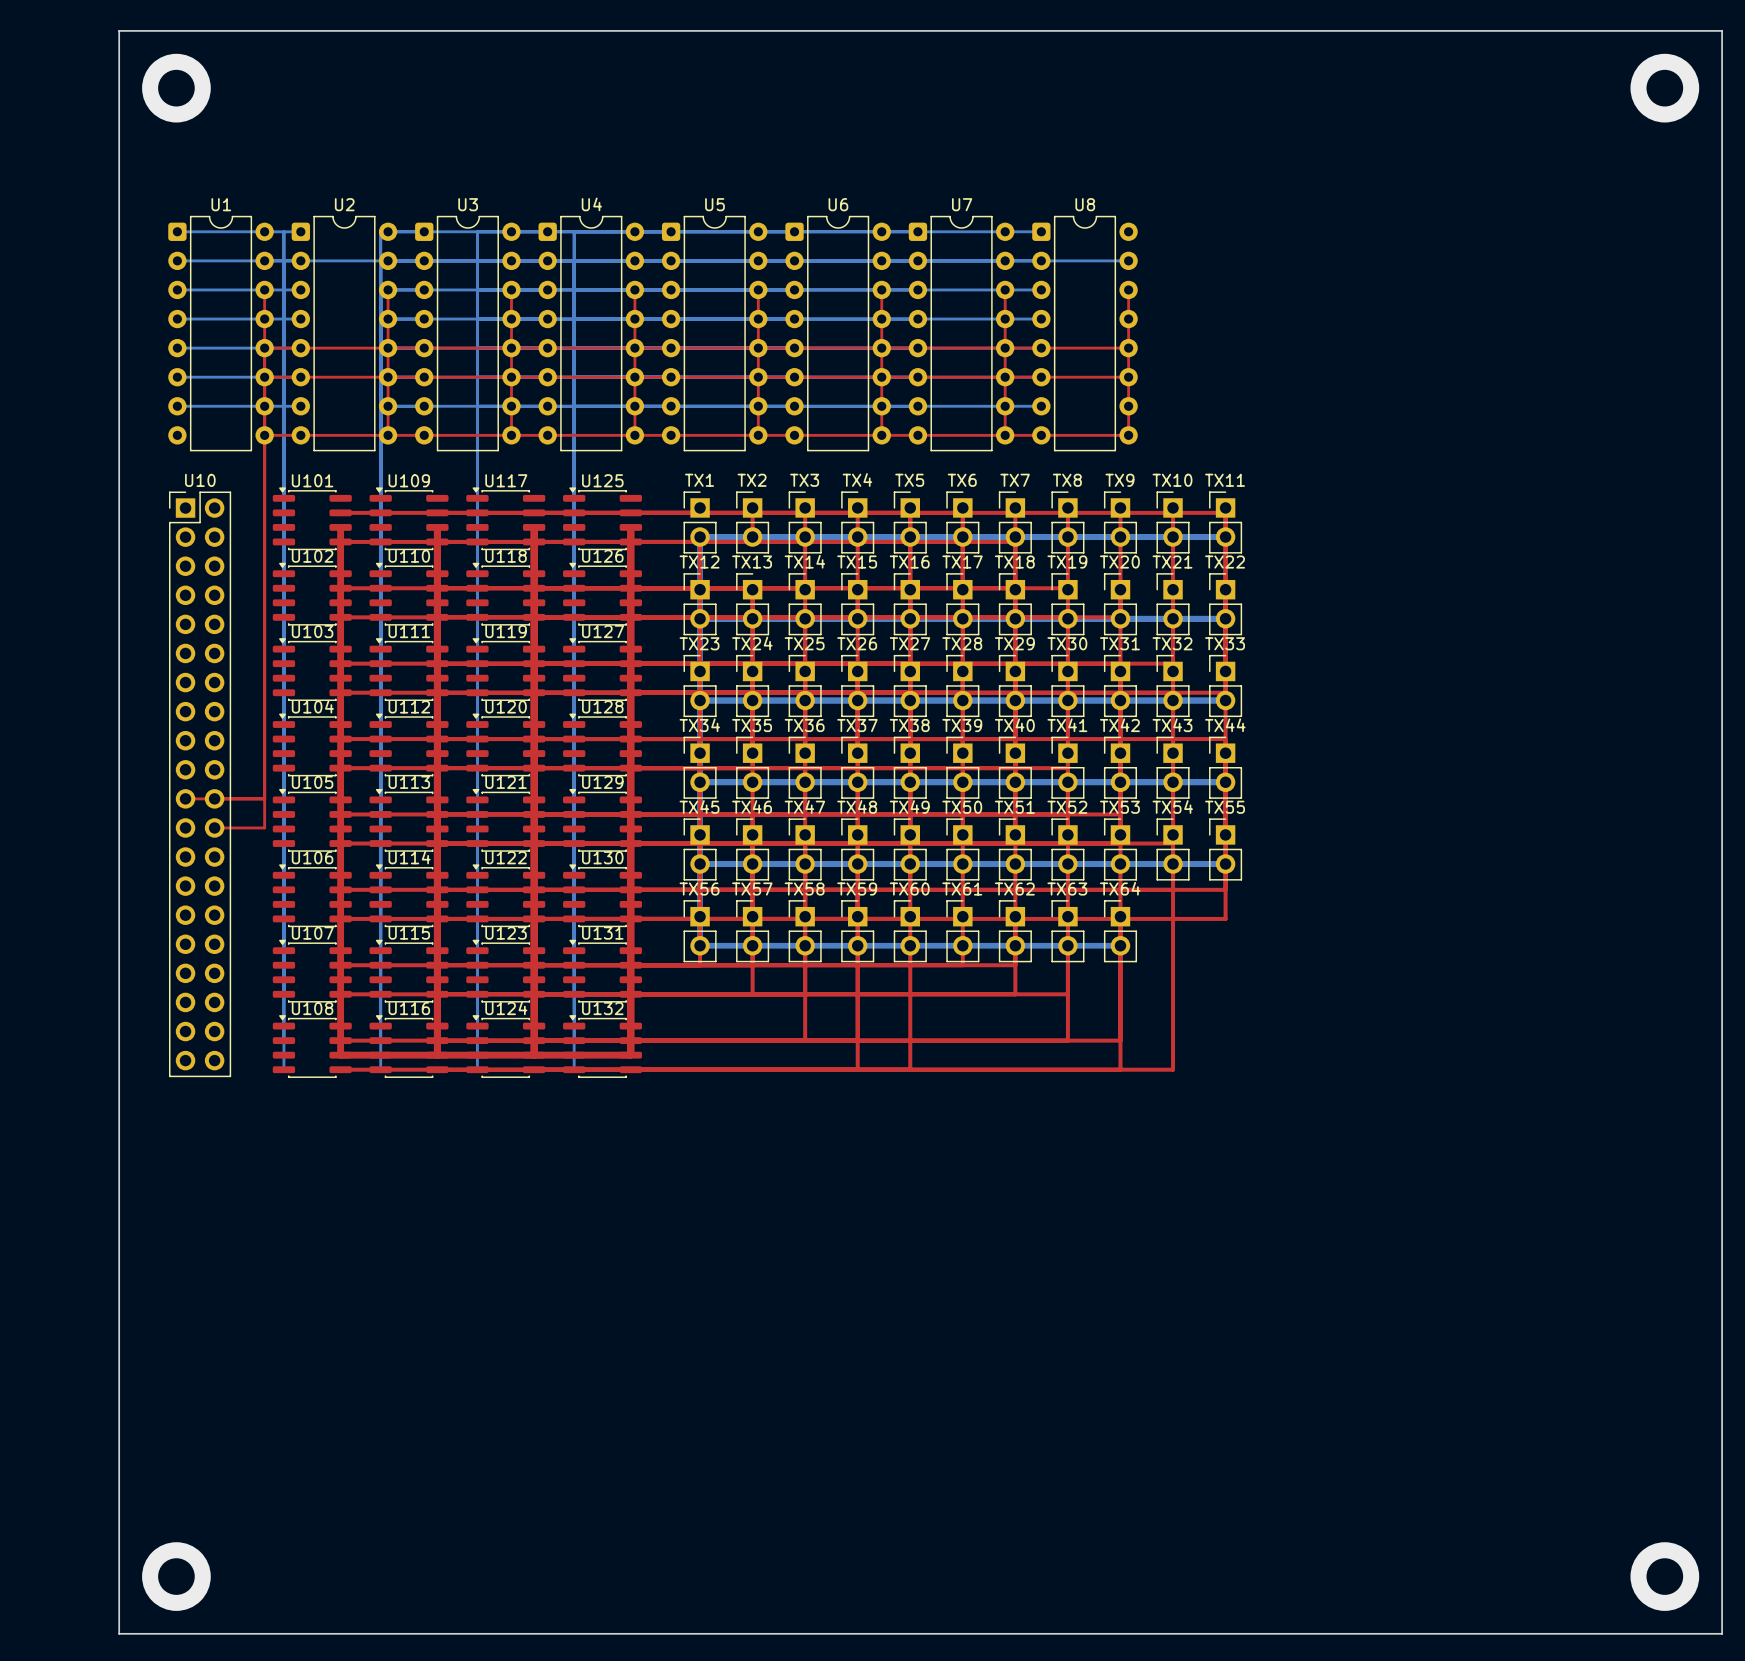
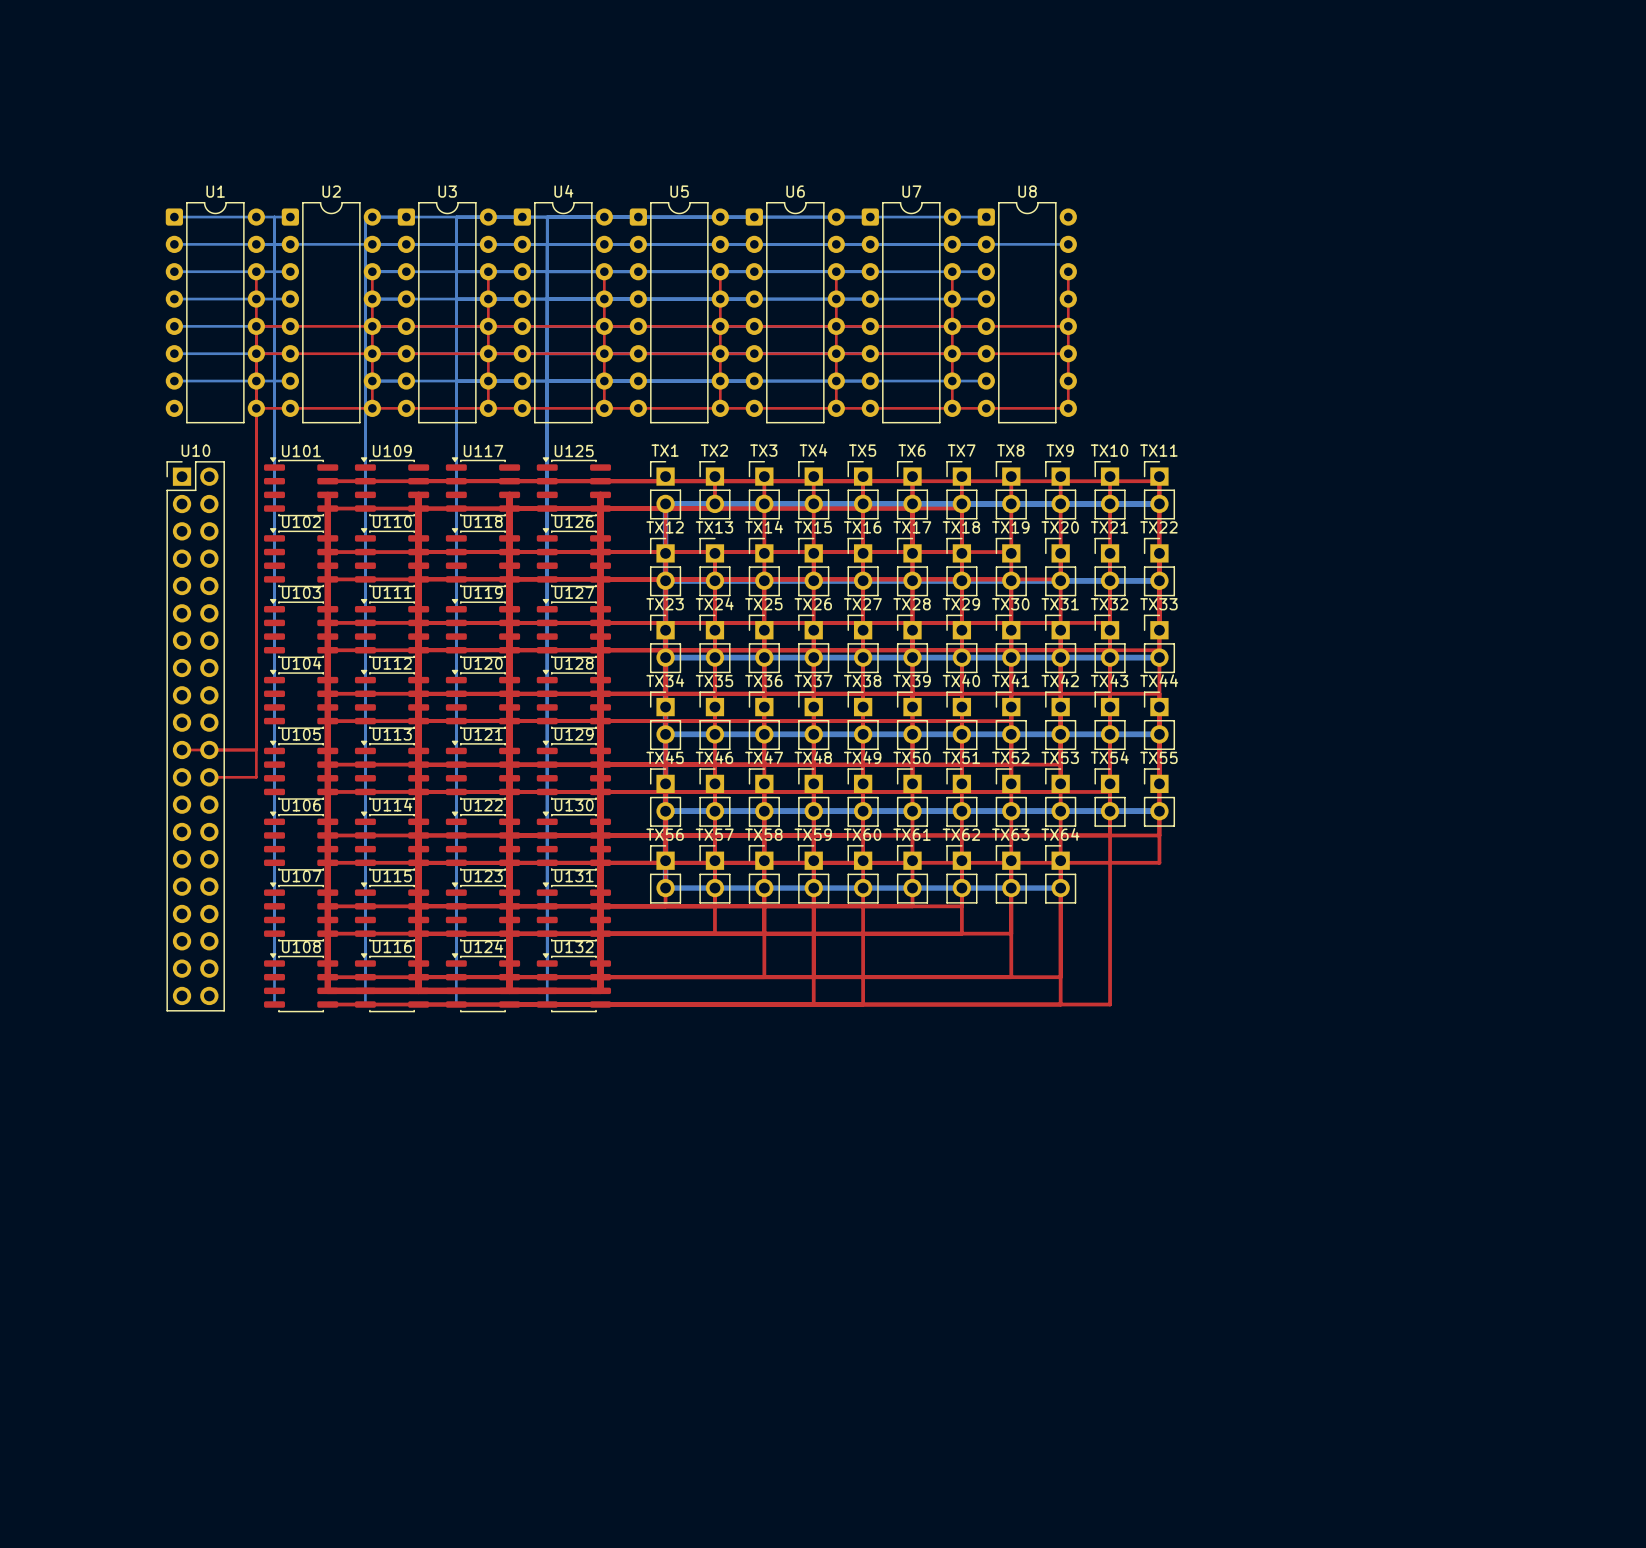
board edge: (119, 30) (1722, 30) (1722, 1633) (119, 1633) (119, 30) -> none
via: (176, 88) -> none
via: (1664, 88) -> none
via: (176, 1576) -> none
via: (1664, 1576) -> none

